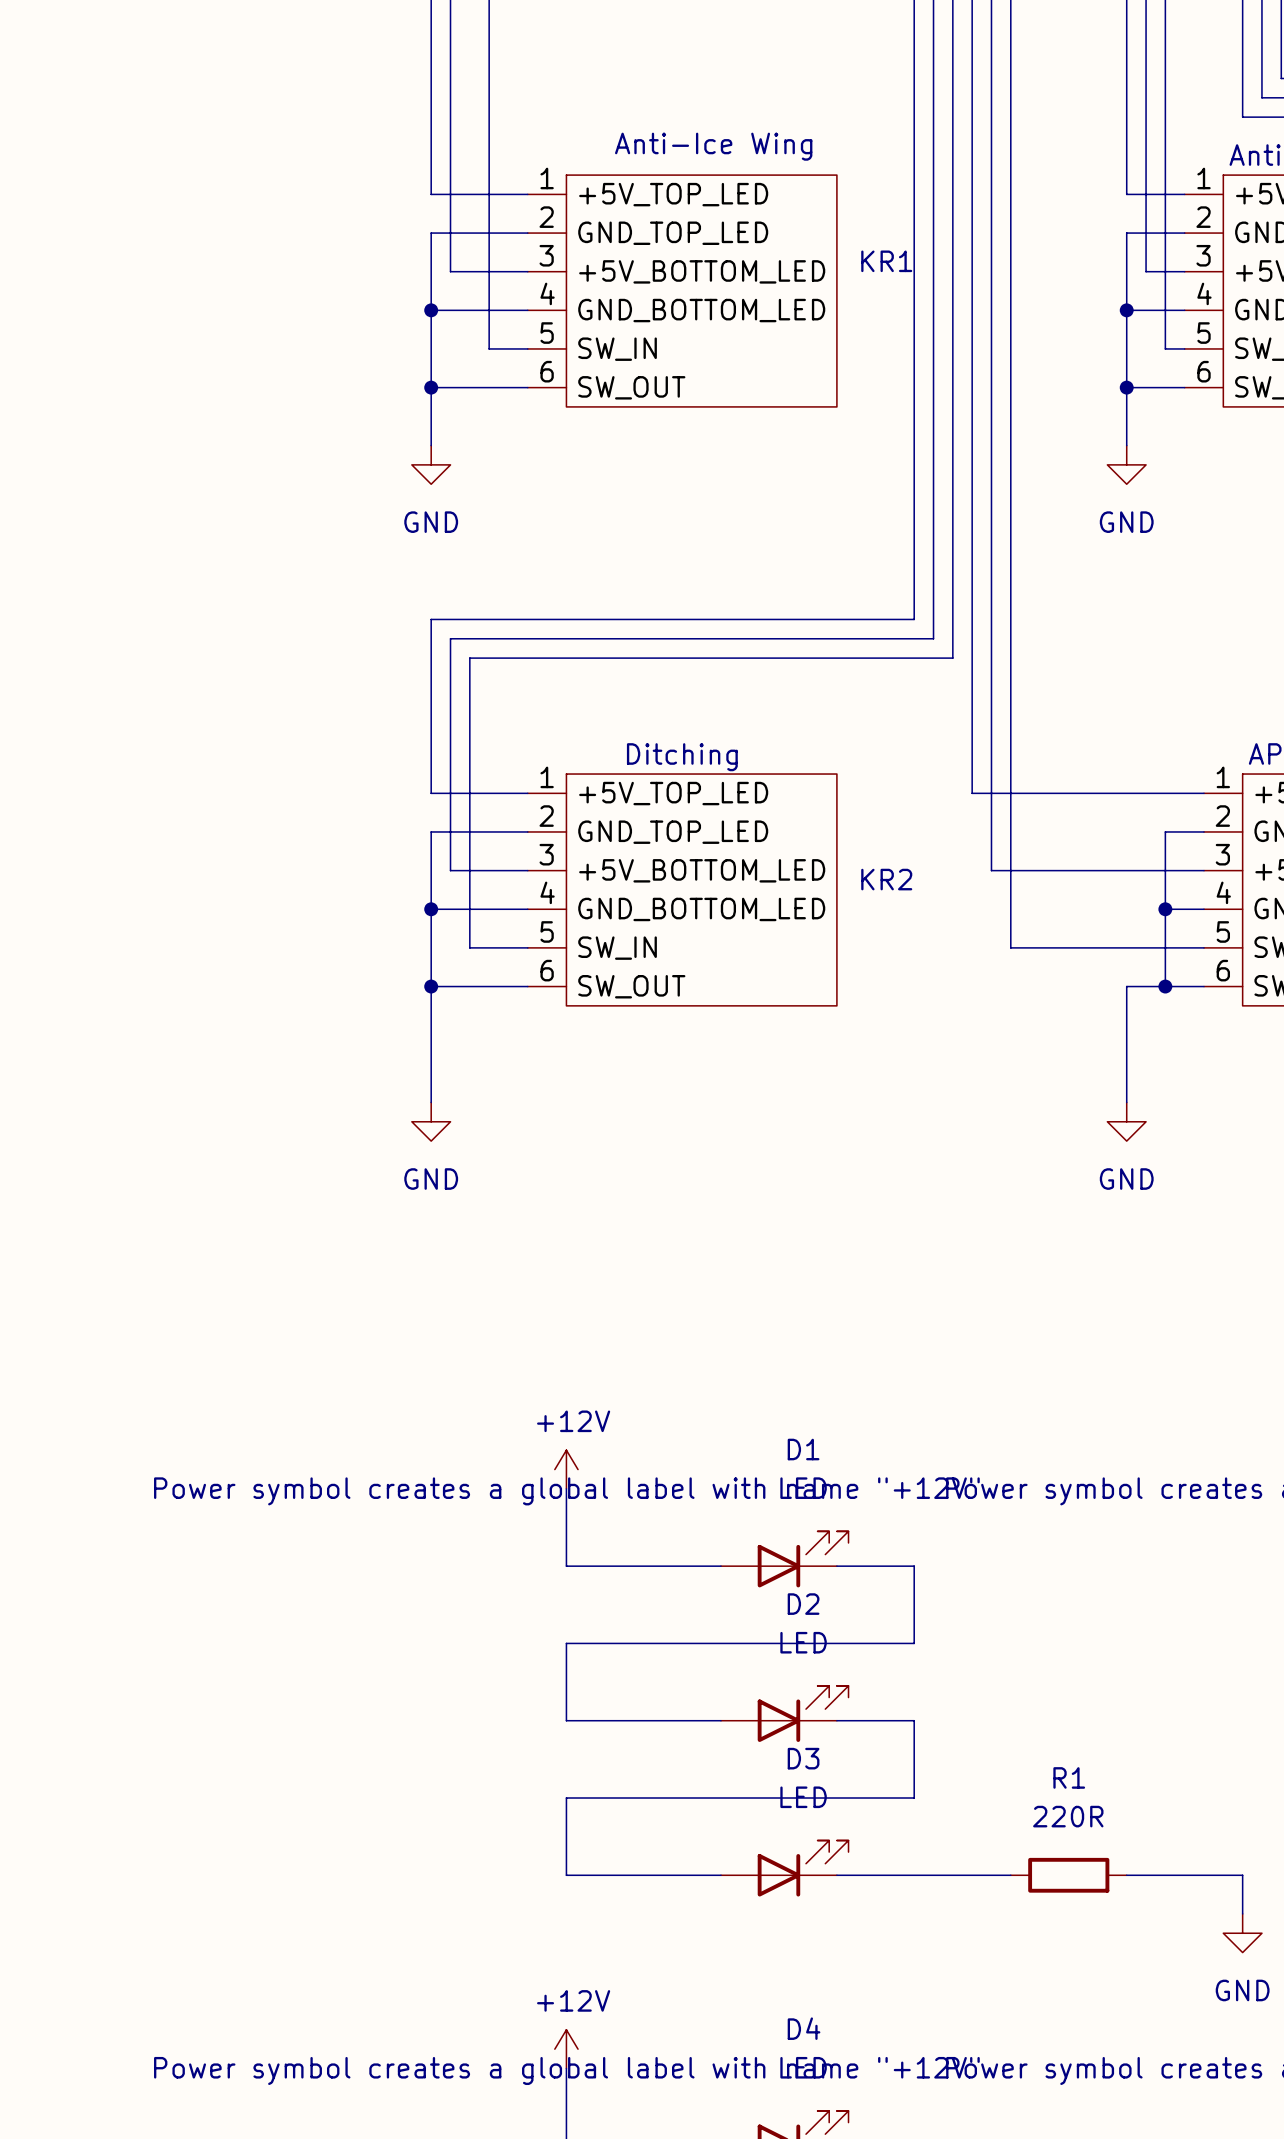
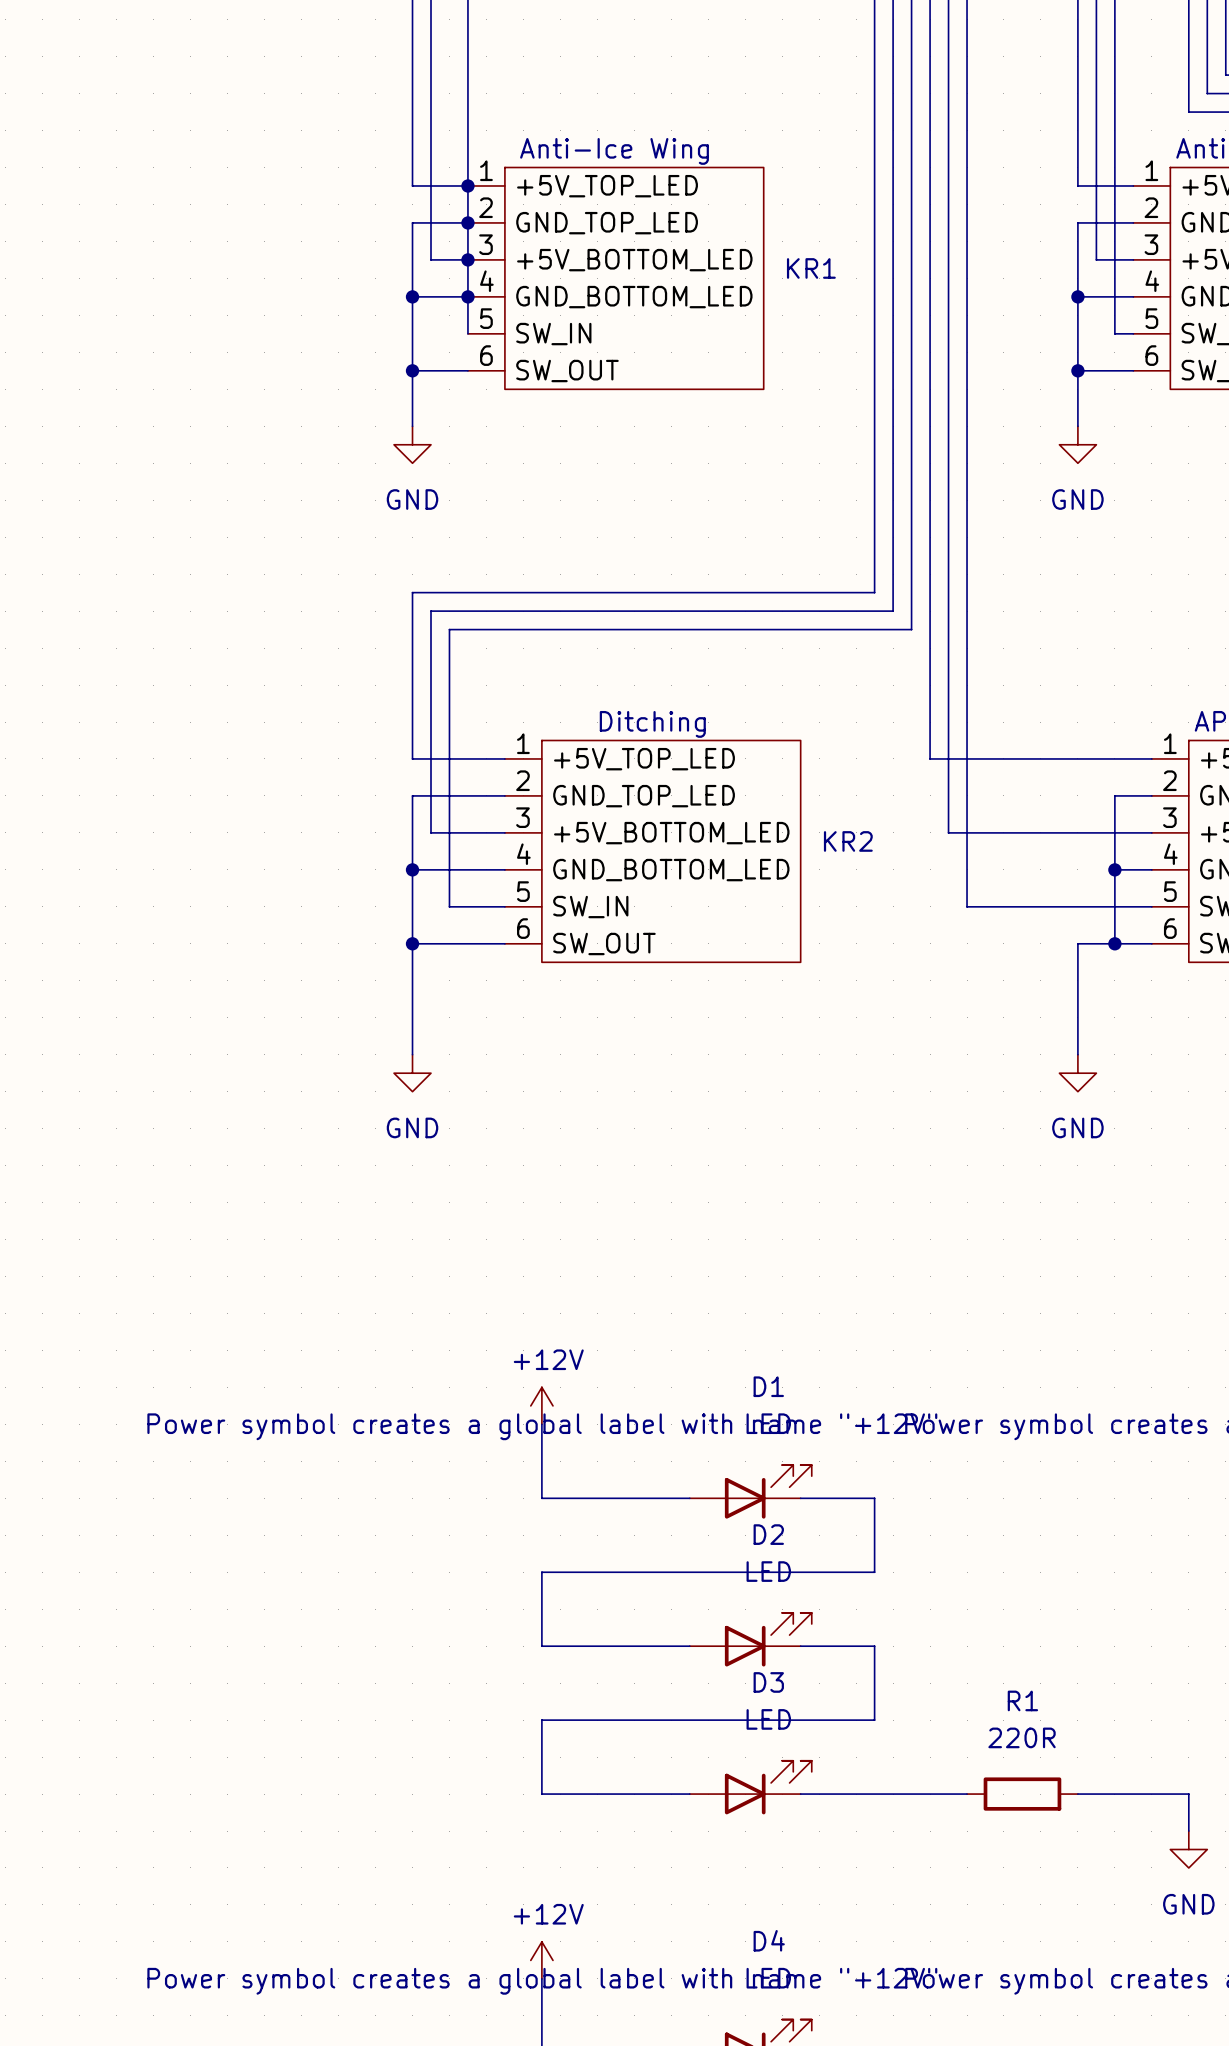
KR1 text position: Anti-Ice Wing (713, 146) -> Anti-Ice Wing (614, 151)
junction: none -> (467, 185)
junction: none -> (467, 222)
KR1 name position: KR1 (886, 261) -> KR1 (811, 268)
junction: none -> (467, 259)
KR1 position: (682, 291) -> (615, 278)
junction: none -> (467, 296)

